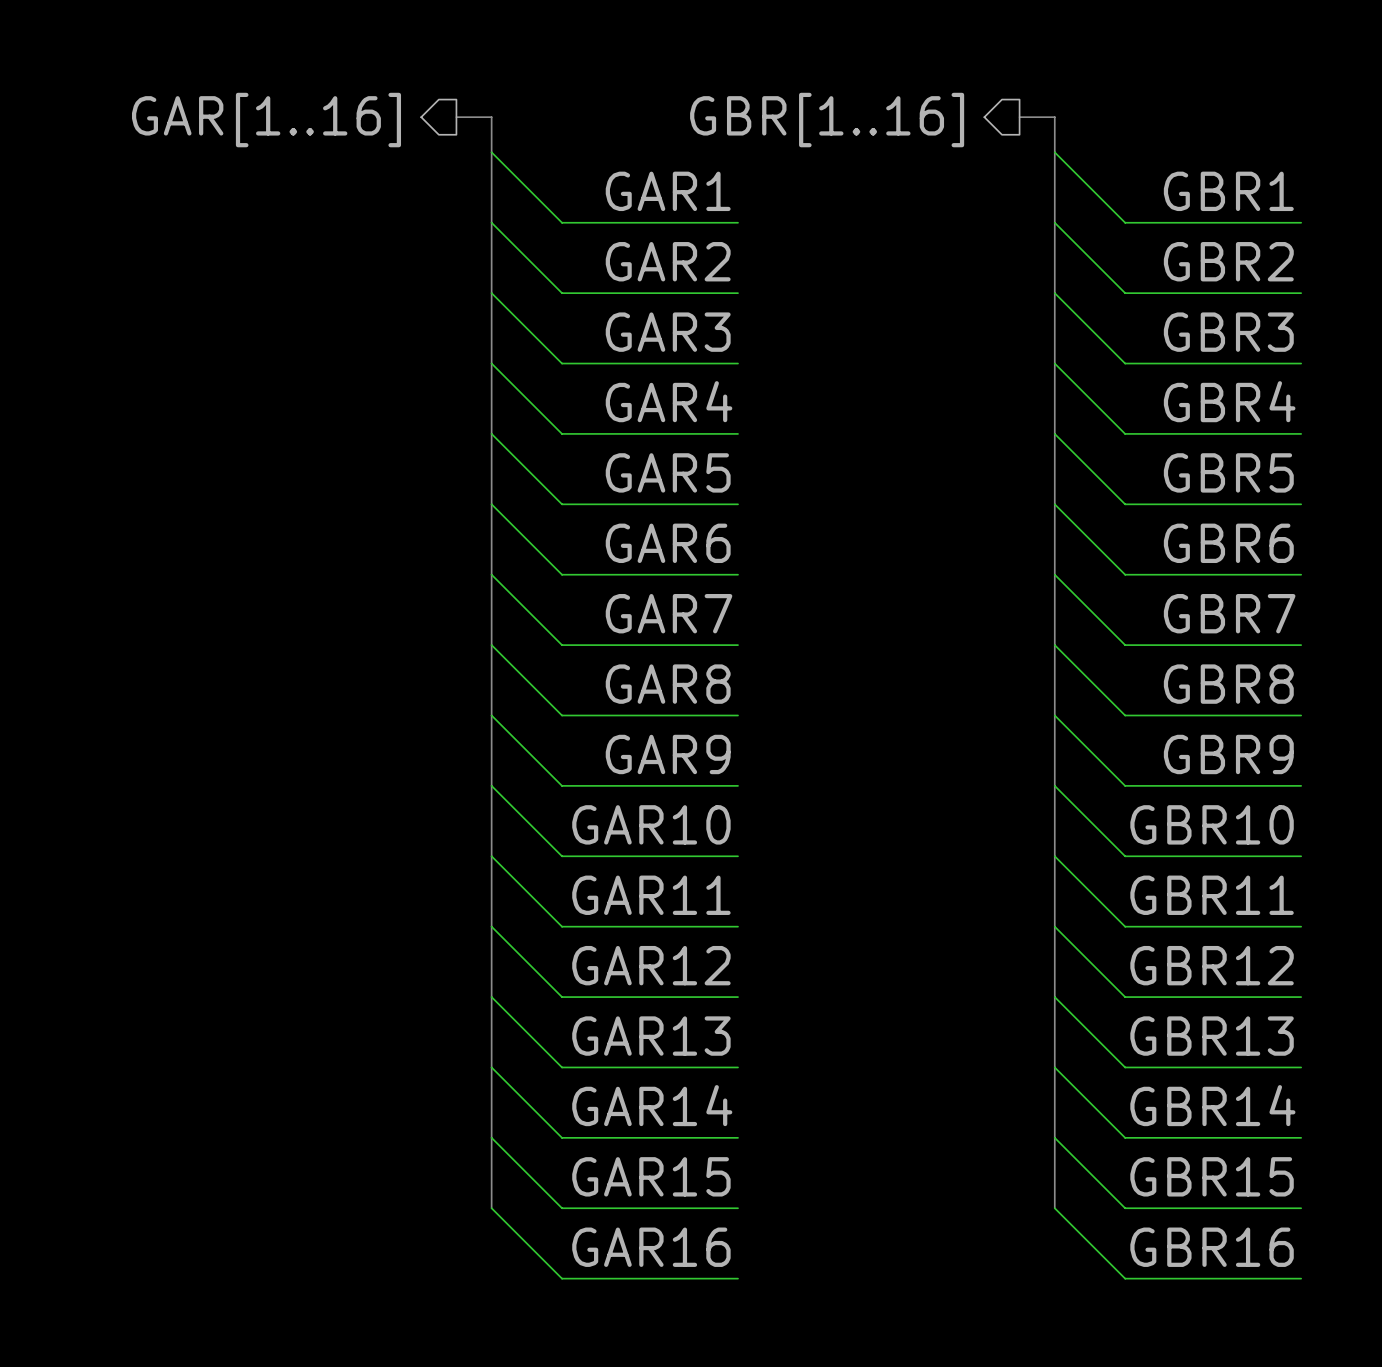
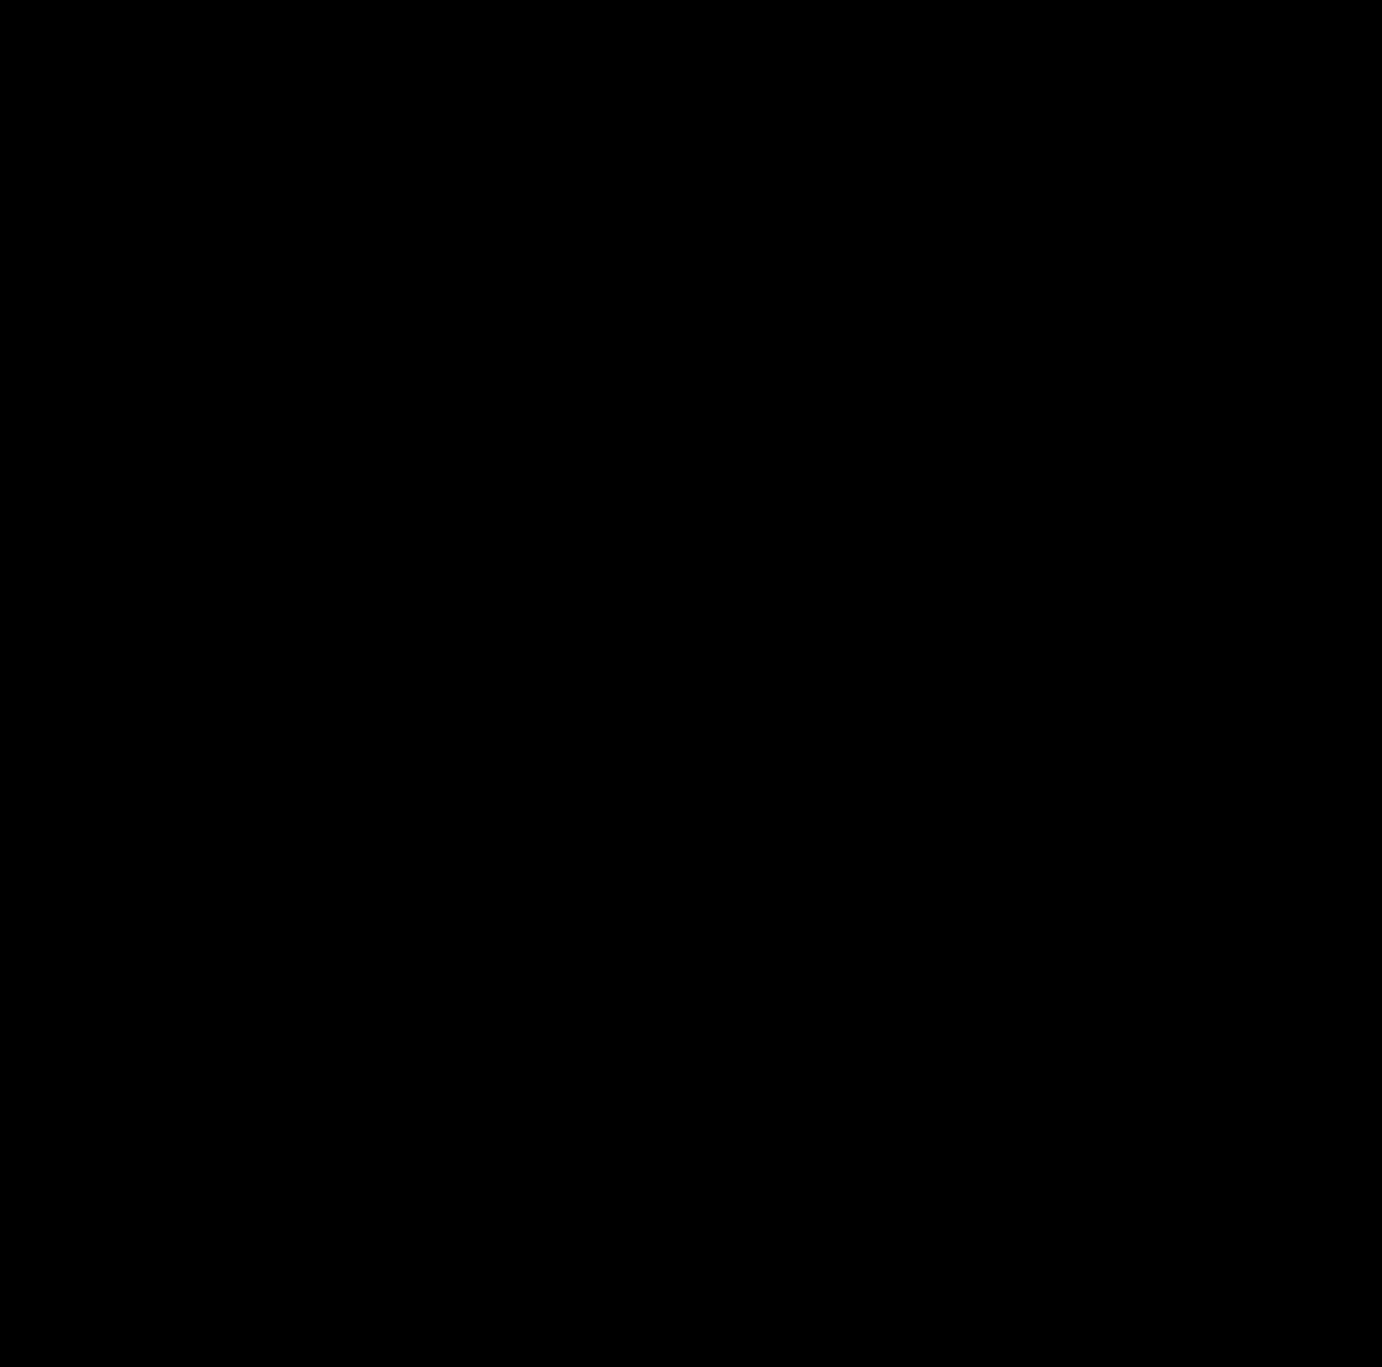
bus: (456, 117) (491, 117) (491, 1208) -> none
bus: (1019, 117) (1054, 117) (1054, 1208) -> none
hierarchical label: GAR[1..16] (266, 120) -> none
hierarchical label: GBR[1..16] (827, 120) -> none
wire: (491, 152) (562, 222) (738, 222) -> none
wire: (1054, 152) (1125, 222) (1301, 222) -> none
label: GAR1 (668, 191) -> none
label: GBR1 (1228, 191) -> none
wire: (491, 222) (562, 293) (738, 293) -> none
wire: (1054, 222) (1125, 293) (1301, 293) -> none
label: GAR2 (668, 261) -> none
label: GBR2 (1228, 261) -> none
wire: (491, 293) (562, 363) (738, 363) -> none
wire: (1054, 293) (1125, 363) (1301, 363) -> none
label: GAR3 (668, 332) -> none
label: GBR3 (1228, 332) -> none
wire: (491, 363) (562, 433) (738, 433) -> none
wire: (1054, 363) (1125, 433) (1301, 433) -> none
label: GAR4 (669, 401) -> none
label: GBR4 (1229, 401) -> none
wire: (491, 433) (562, 504) (738, 504) -> none
wire: (1054, 433) (1125, 504) (1301, 504) -> none
label: GAR5 (668, 472) -> none
label: GBR5 (1228, 472) -> none
wire: (491, 504) (562, 574) (738, 574) -> none
wire: (1054, 504) (1125, 574) (1301, 574) -> none
label: GAR6 (668, 543) -> none
label: GBR6 (1228, 543) -> none
wire: (491, 574) (562, 645) (738, 645) -> none
wire: (1054, 574) (1125, 645) (1301, 645) -> none
label: GAR7 (669, 613) -> none
label: GBR7 (1229, 613) -> none
wire: (491, 645) (562, 715) (738, 715) -> none
wire: (1054, 645) (1125, 715) (1301, 715) -> none
label: GAR8 (668, 684) -> none
label: GBR8 (1228, 684) -> none
wire: (491, 715) (562, 785) (738, 785) -> none
wire: (1054, 715) (1125, 785) (1301, 785) -> none
label: GAR9 (668, 754) -> none
label: GBR9 (1228, 754) -> none
wire: (491, 785) (562, 856) (738, 856) -> none
wire: (1054, 785) (1125, 856) (1301, 856) -> none
label: GAR10 (651, 824) -> none
label: GBR10 (1212, 824) -> none
wire: (491, 856) (562, 926) (738, 926) -> none
wire: (1054, 856) (1125, 926) (1301, 926) -> none
label: GAR11 (651, 895) -> none
label: GBR11 (1212, 895) -> none
wire: (491, 926) (562, 997) (738, 997) -> none
wire: (1054, 926) (1125, 997) (1301, 997) -> none
label: GAR12 (651, 965) -> none
label: GBR12 (1212, 965) -> none
wire: (491, 997) (562, 1067) (738, 1067) -> none
wire: (1054, 997) (1125, 1067) (1301, 1067) -> none
label: GAR13 (651, 1036) -> none
label: GBR13 (1212, 1036) -> none
wire: (491, 1067) (562, 1137) (738, 1137) -> none
wire: (1054, 1067) (1125, 1137) (1301, 1137) -> none
label: GAR14 (652, 1105) -> none
label: GBR14 (1212, 1105) -> none
wire: (491, 1137) (562, 1208) (738, 1208) -> none
wire: (1054, 1137) (1125, 1208) (1301, 1208) -> none
label: GAR15 (651, 1176) -> none
label: GBR15 (1212, 1176) -> none
wire: (491, 1208) (562, 1278) (738, 1278) -> none
wire: (1054, 1208) (1125, 1278) (1301, 1278) -> none
label: GAR16 (651, 1247) -> none
label: GBR16 (1212, 1247) -> none

